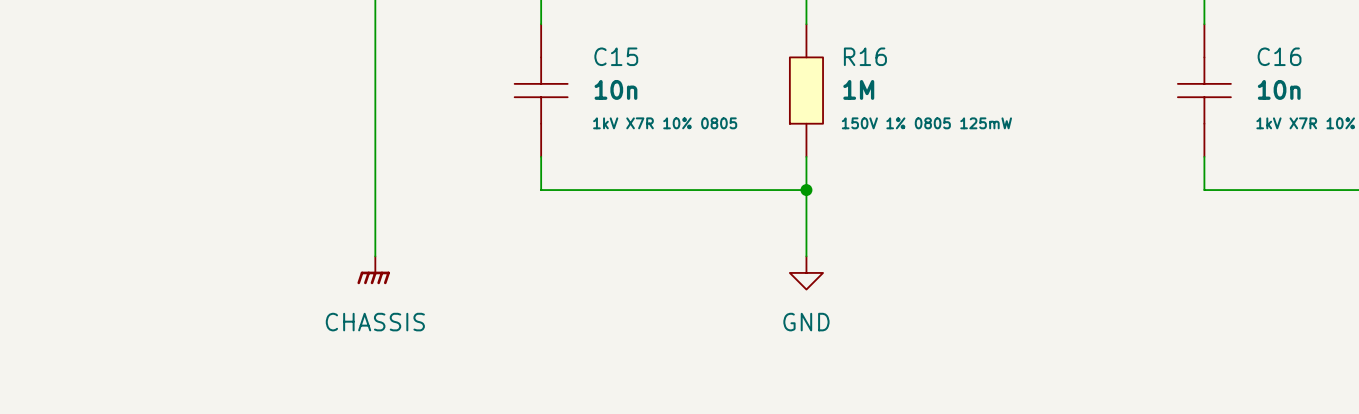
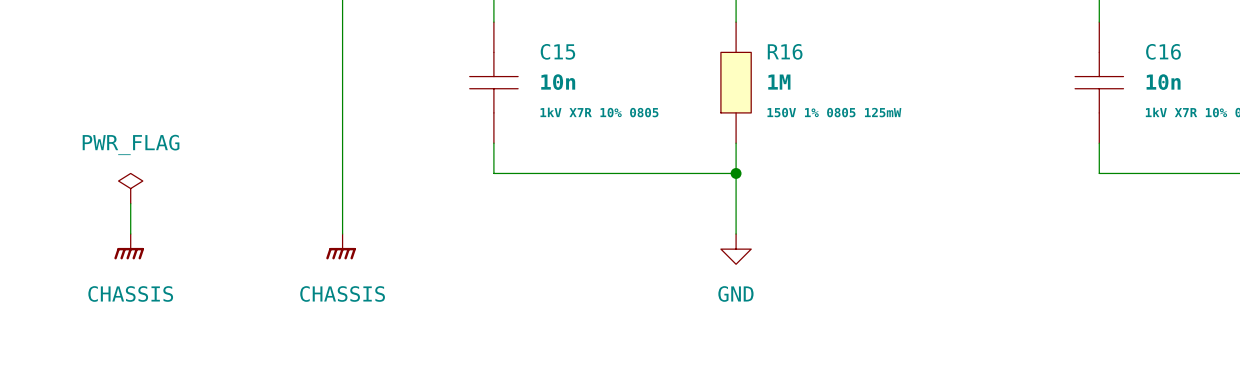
power symbol: none -> PWR_FLAG (130, 188)
wire: none -> (130, 203) (130, 233)
power symbol: none -> CHASSIS (129, 246)

